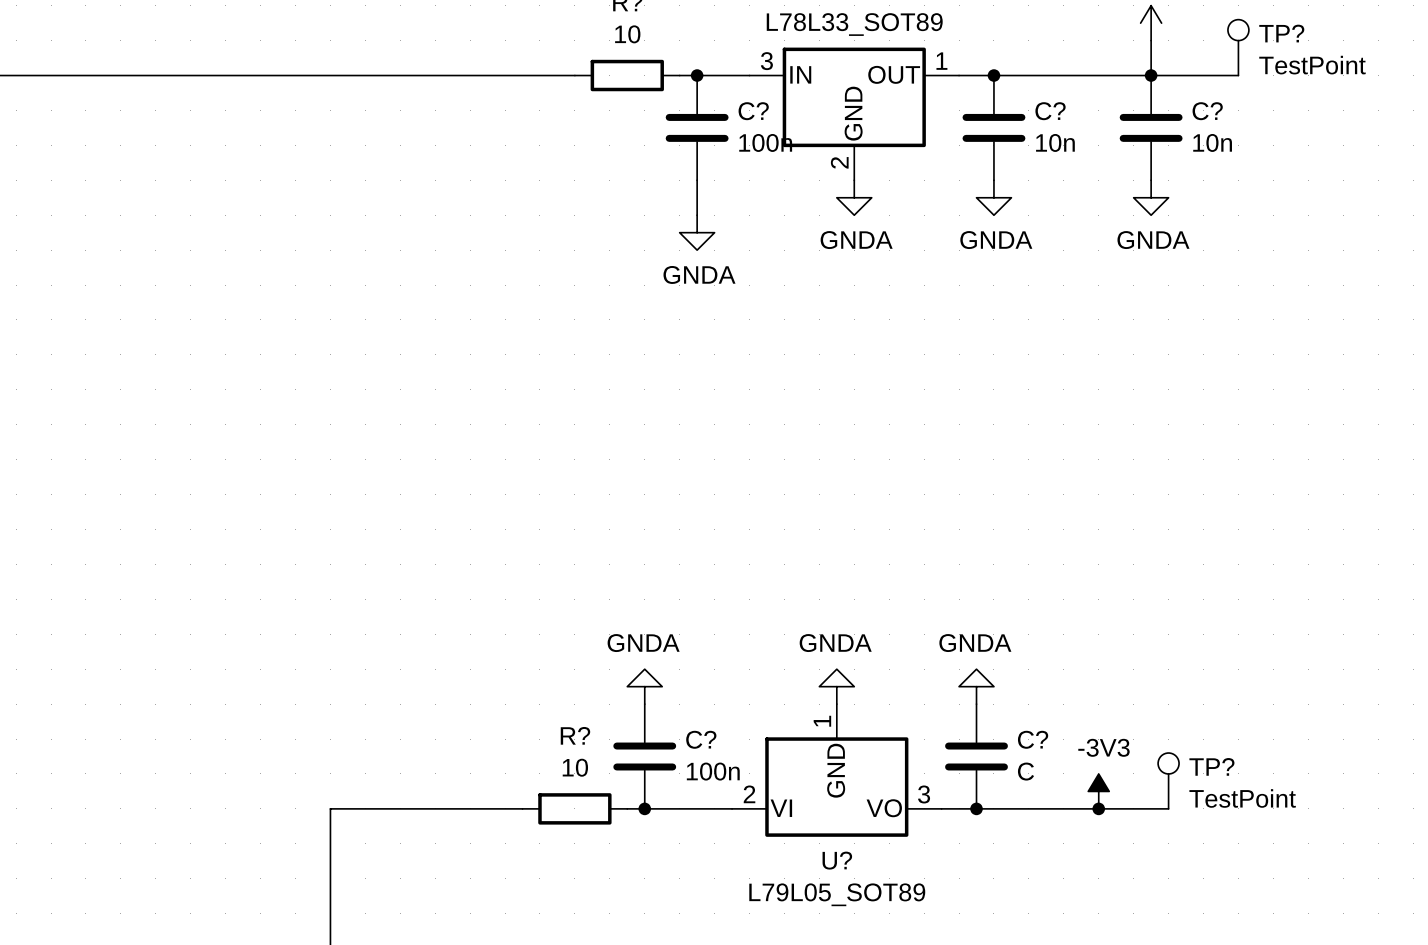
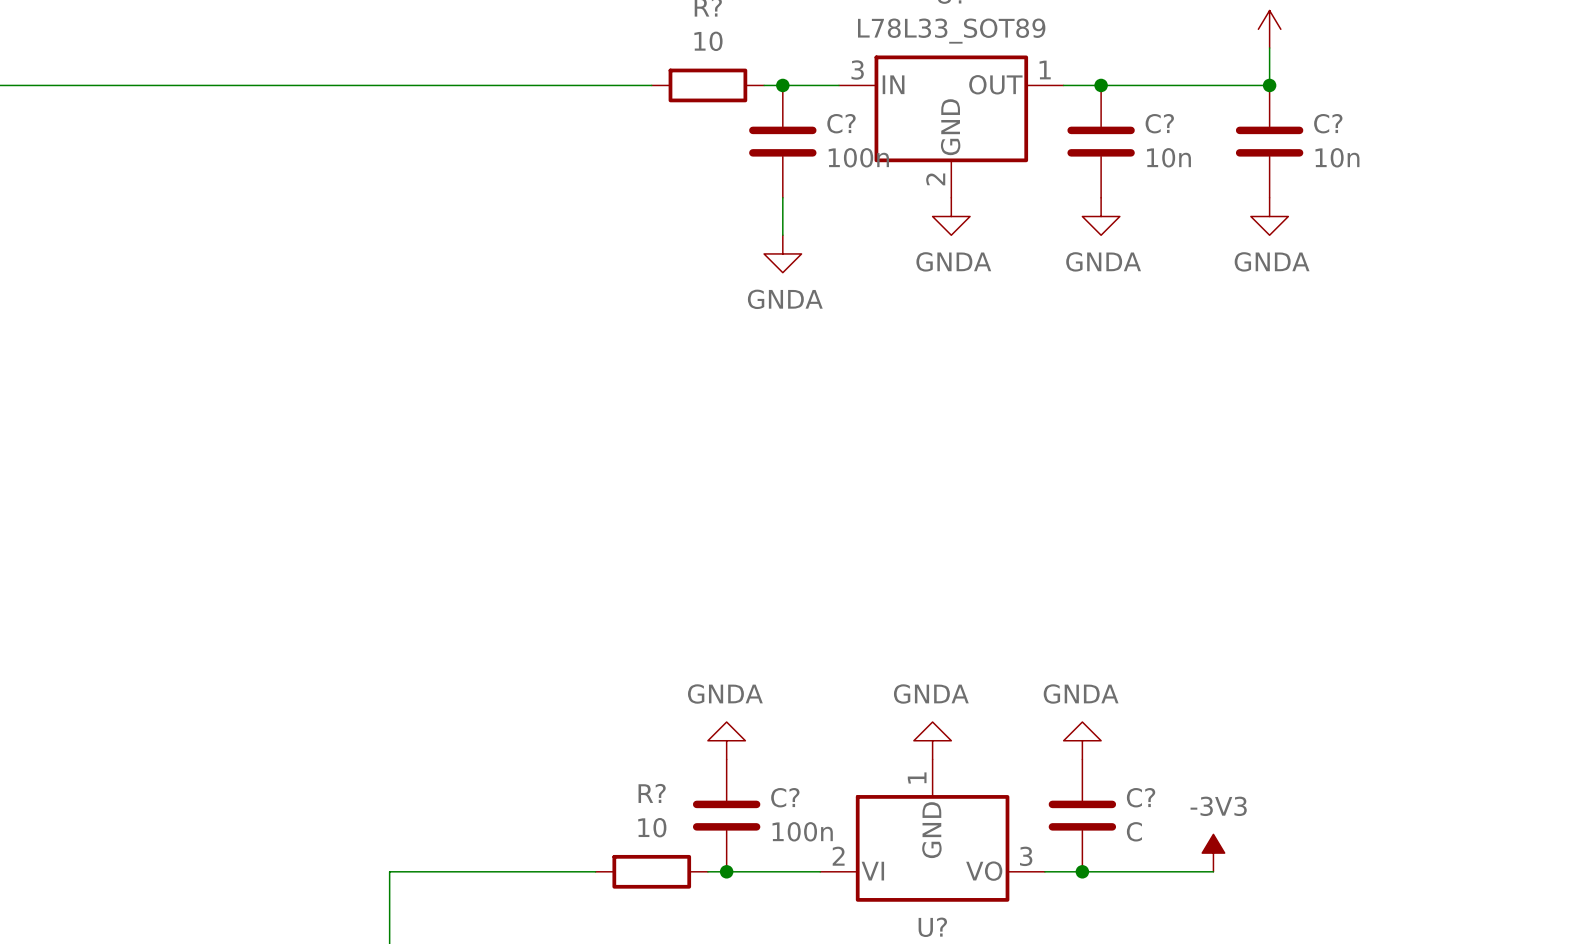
TP?: TestPoint (1238, 47) -> none
wire: (1151, 75) (1238, 75) -> none
TP?: TestPoint (1168, 780) -> none
wire: (1098, 808) (1168, 808) -> none
junction: (1098, 808) -> none

